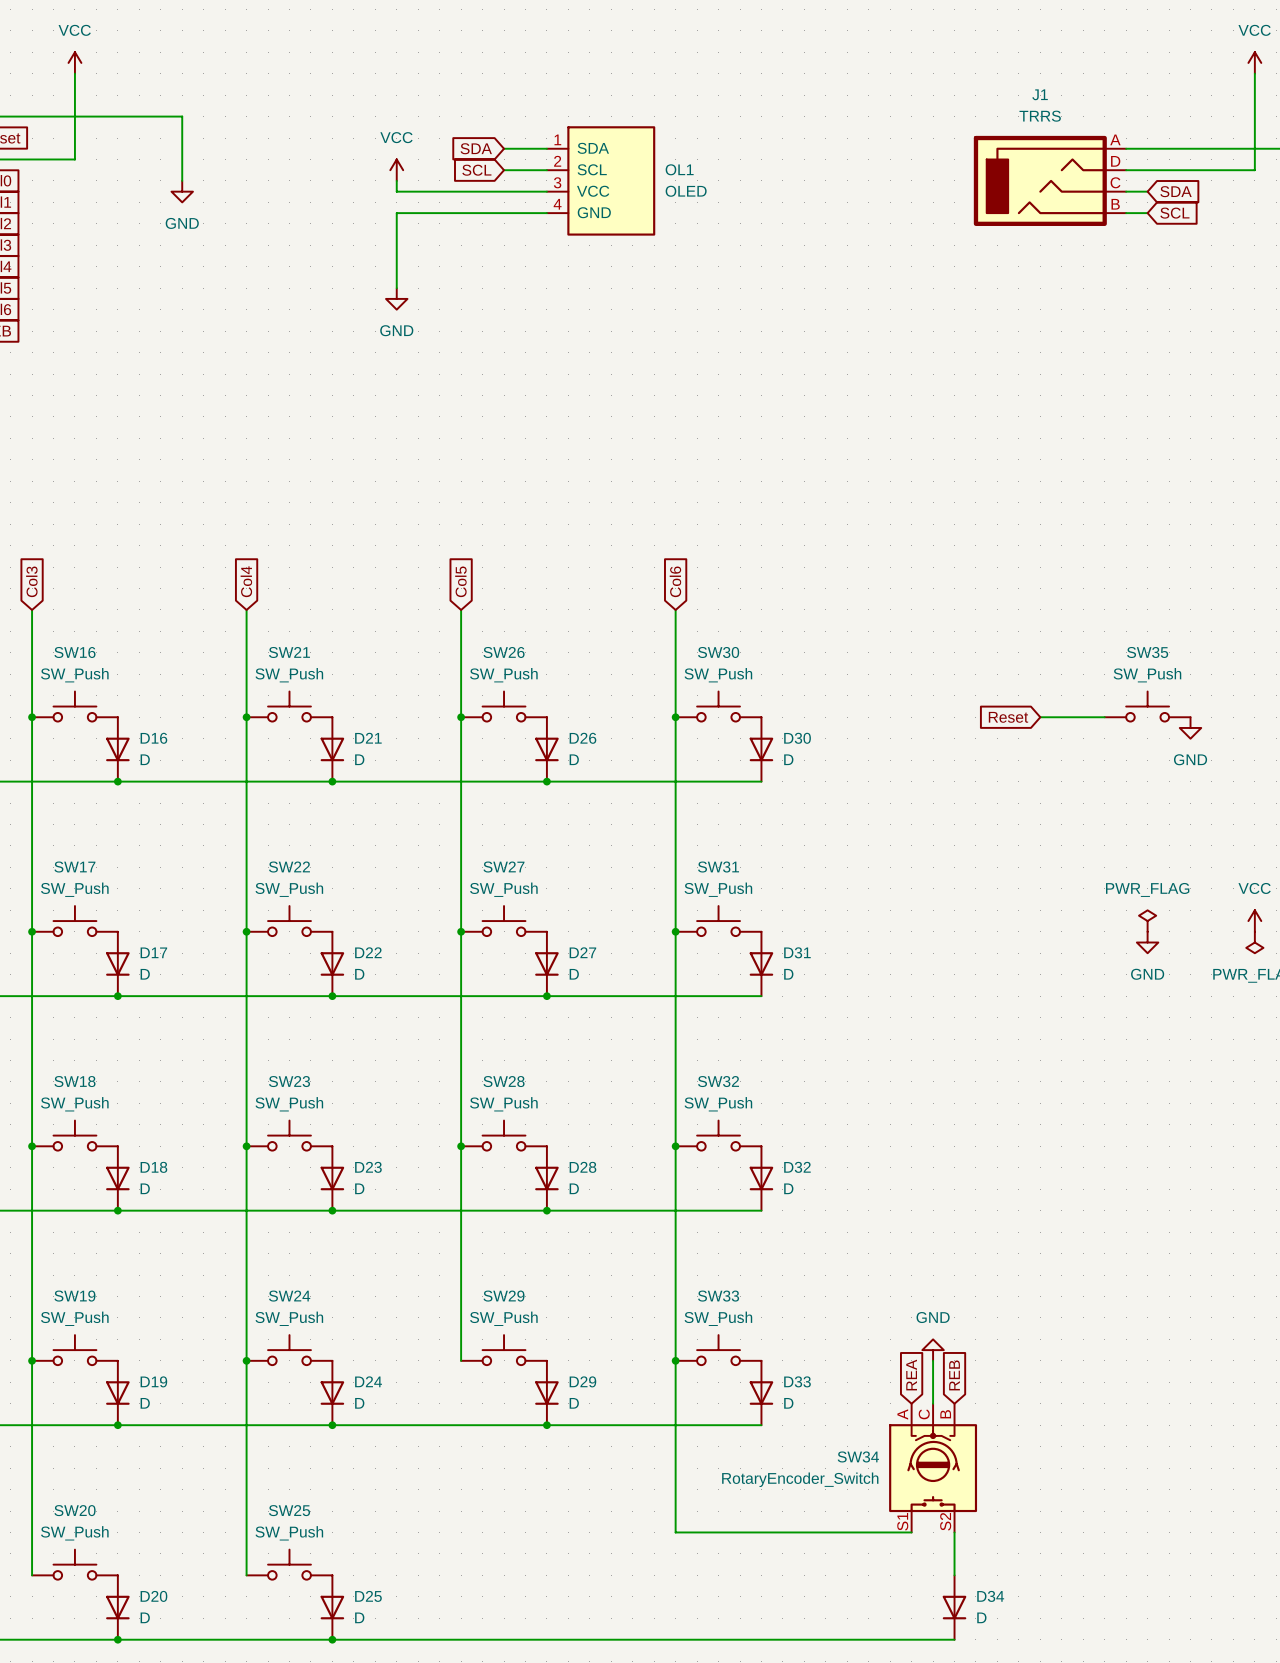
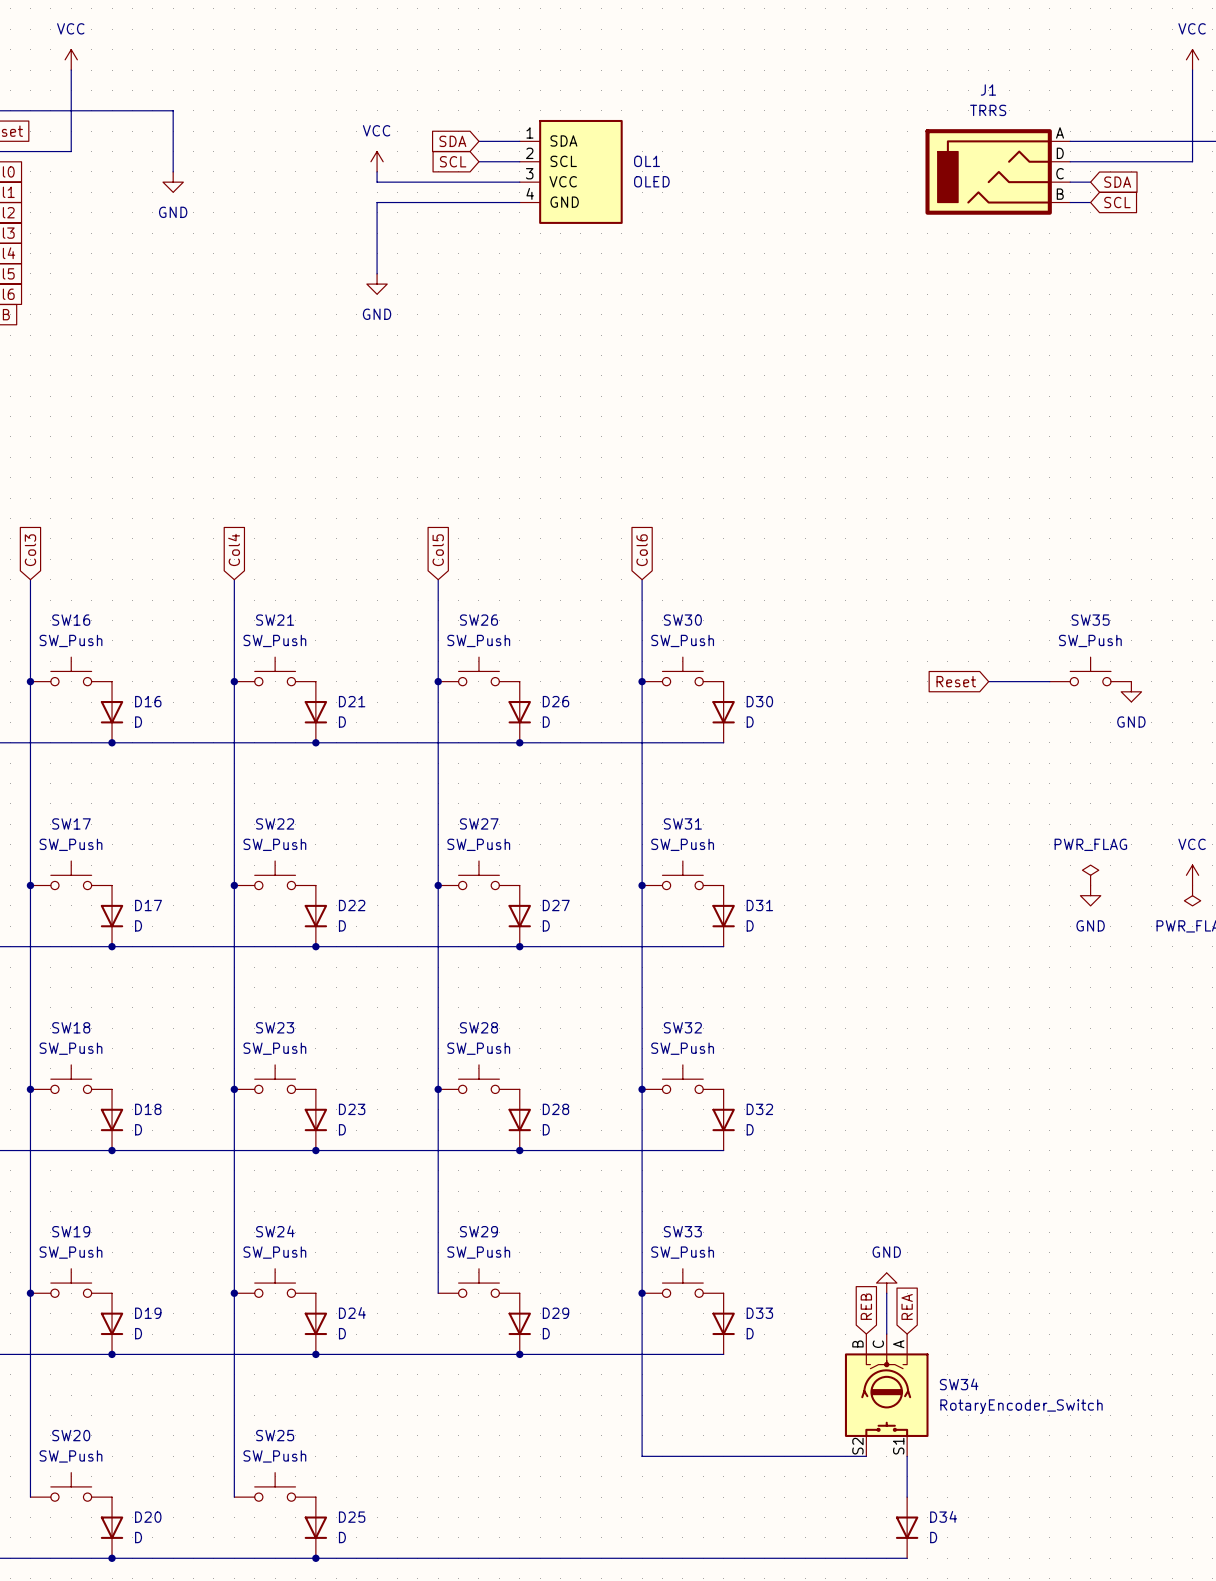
global label: REA (911, 1375) -> REB (866, 1306)
global label: REB (954, 1375) -> REA (907, 1306)
SW34 flip: as is (933, 1468) -> left-right (886, 1395)

